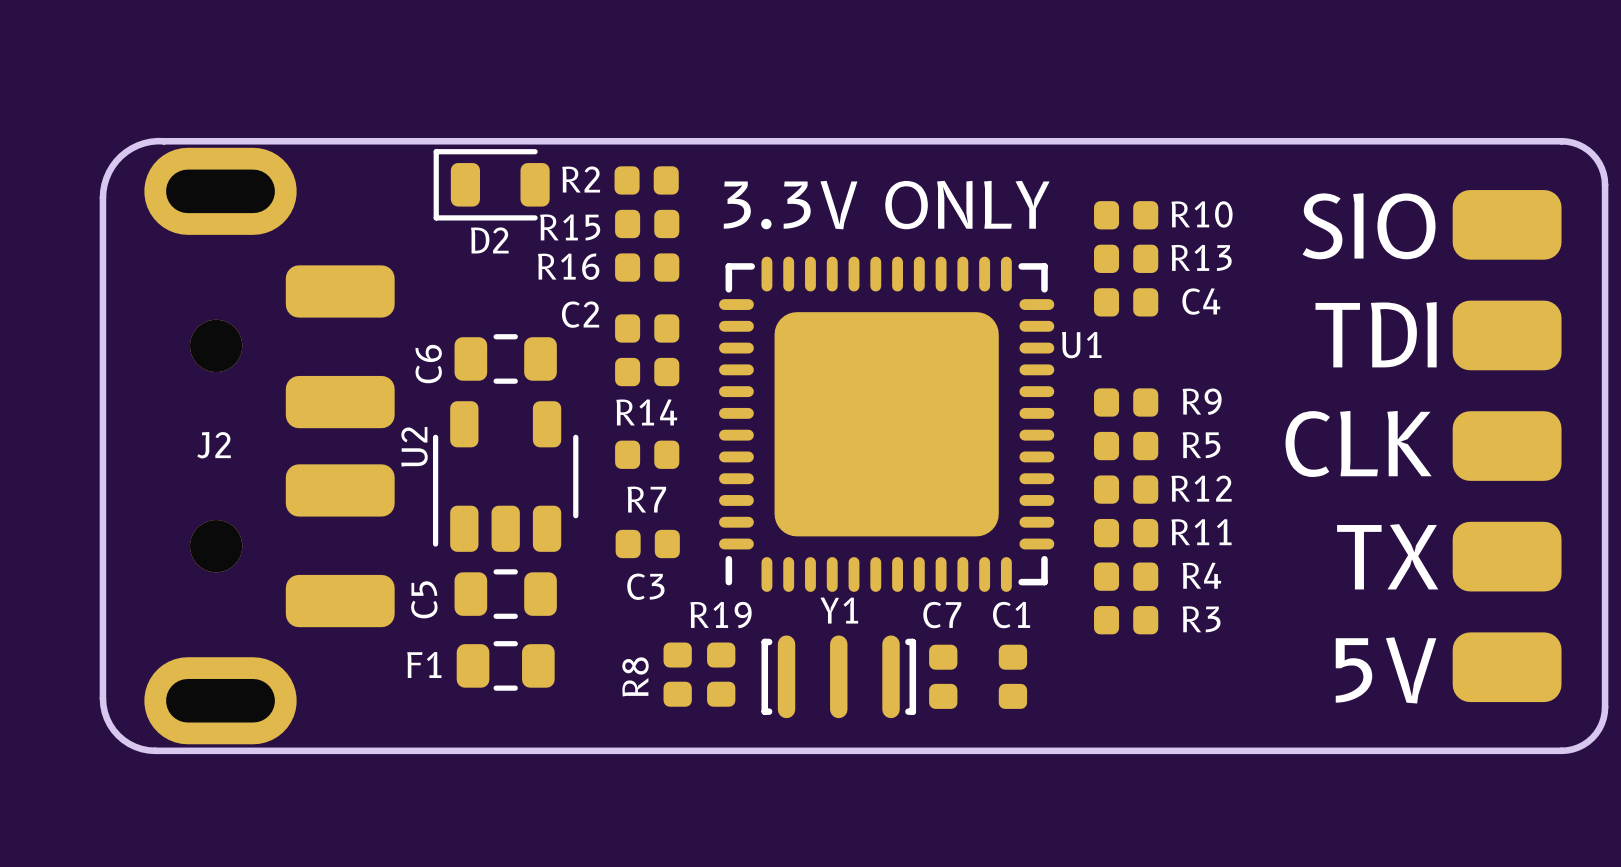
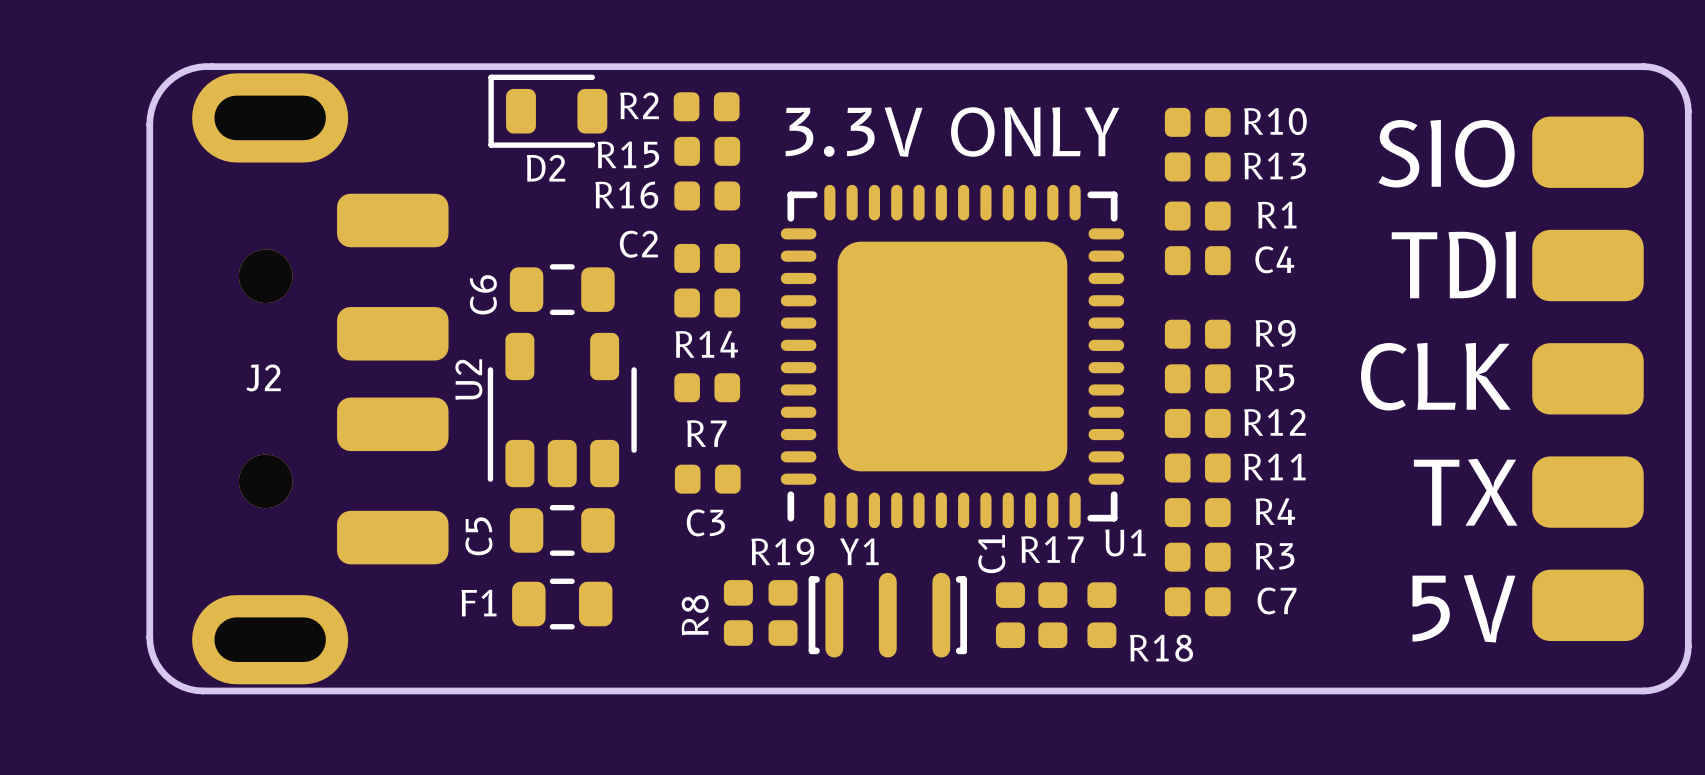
R10 position: (1126, 215) -> (1197, 122)
R13 position: (1126, 258) -> (1197, 166)
R1: none -> (1197, 216)
C4 position: (1126, 302) -> (1197, 260)
U1 name position: U1 (1081, 345) -> U1 (1125, 542)
Y1 name position: Y1 (839, 610) -> Y1 (859, 551)
C7 name: C7 (942, 615) -> C1 (991, 554)
C7: none -> (1197, 601)
Y1 position: (838, 676) -> (887, 615)
R17: none -> (1052, 615)
C1: (1012, 676) -> none
R18: none -> (1101, 615)

